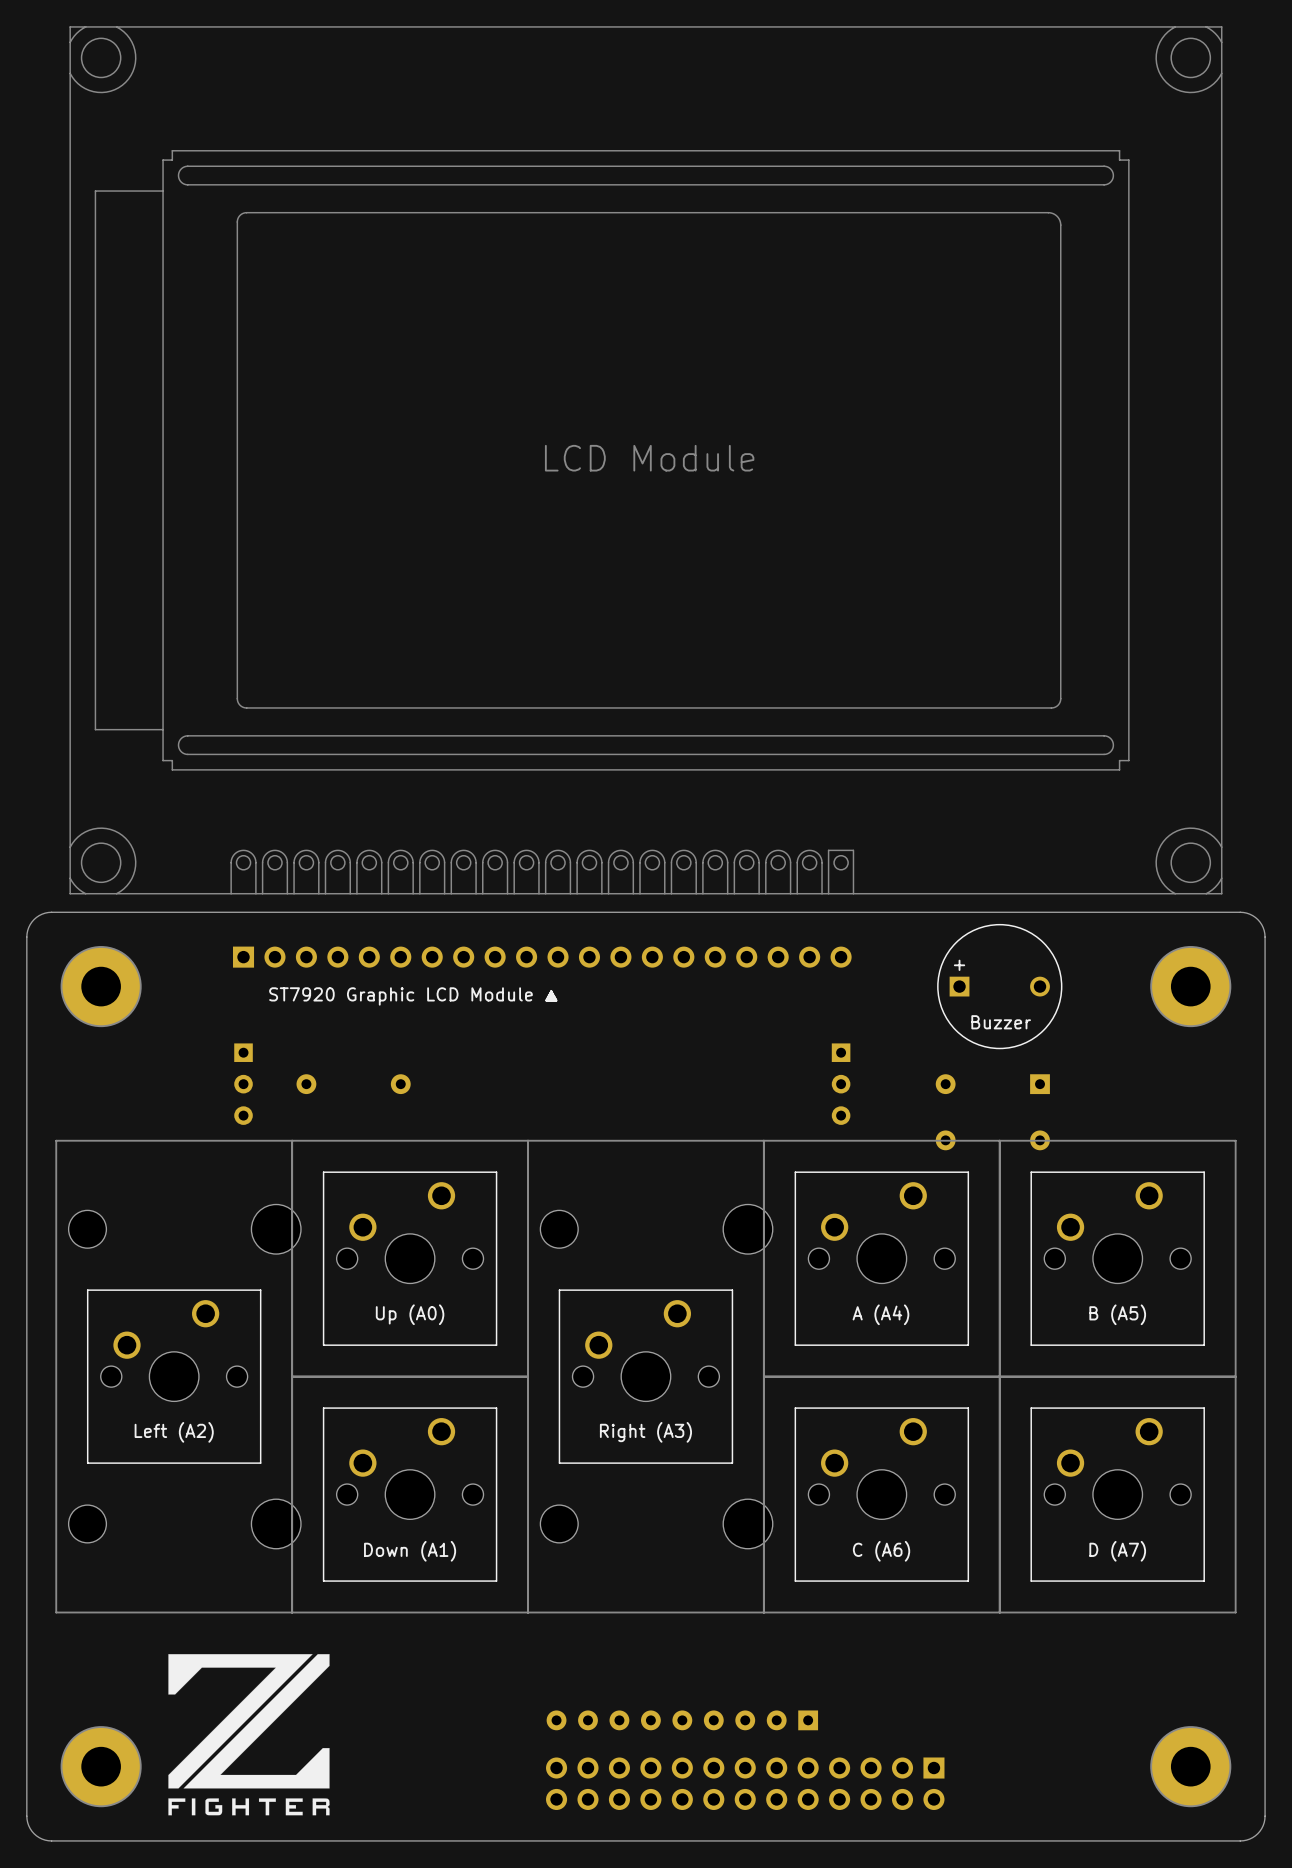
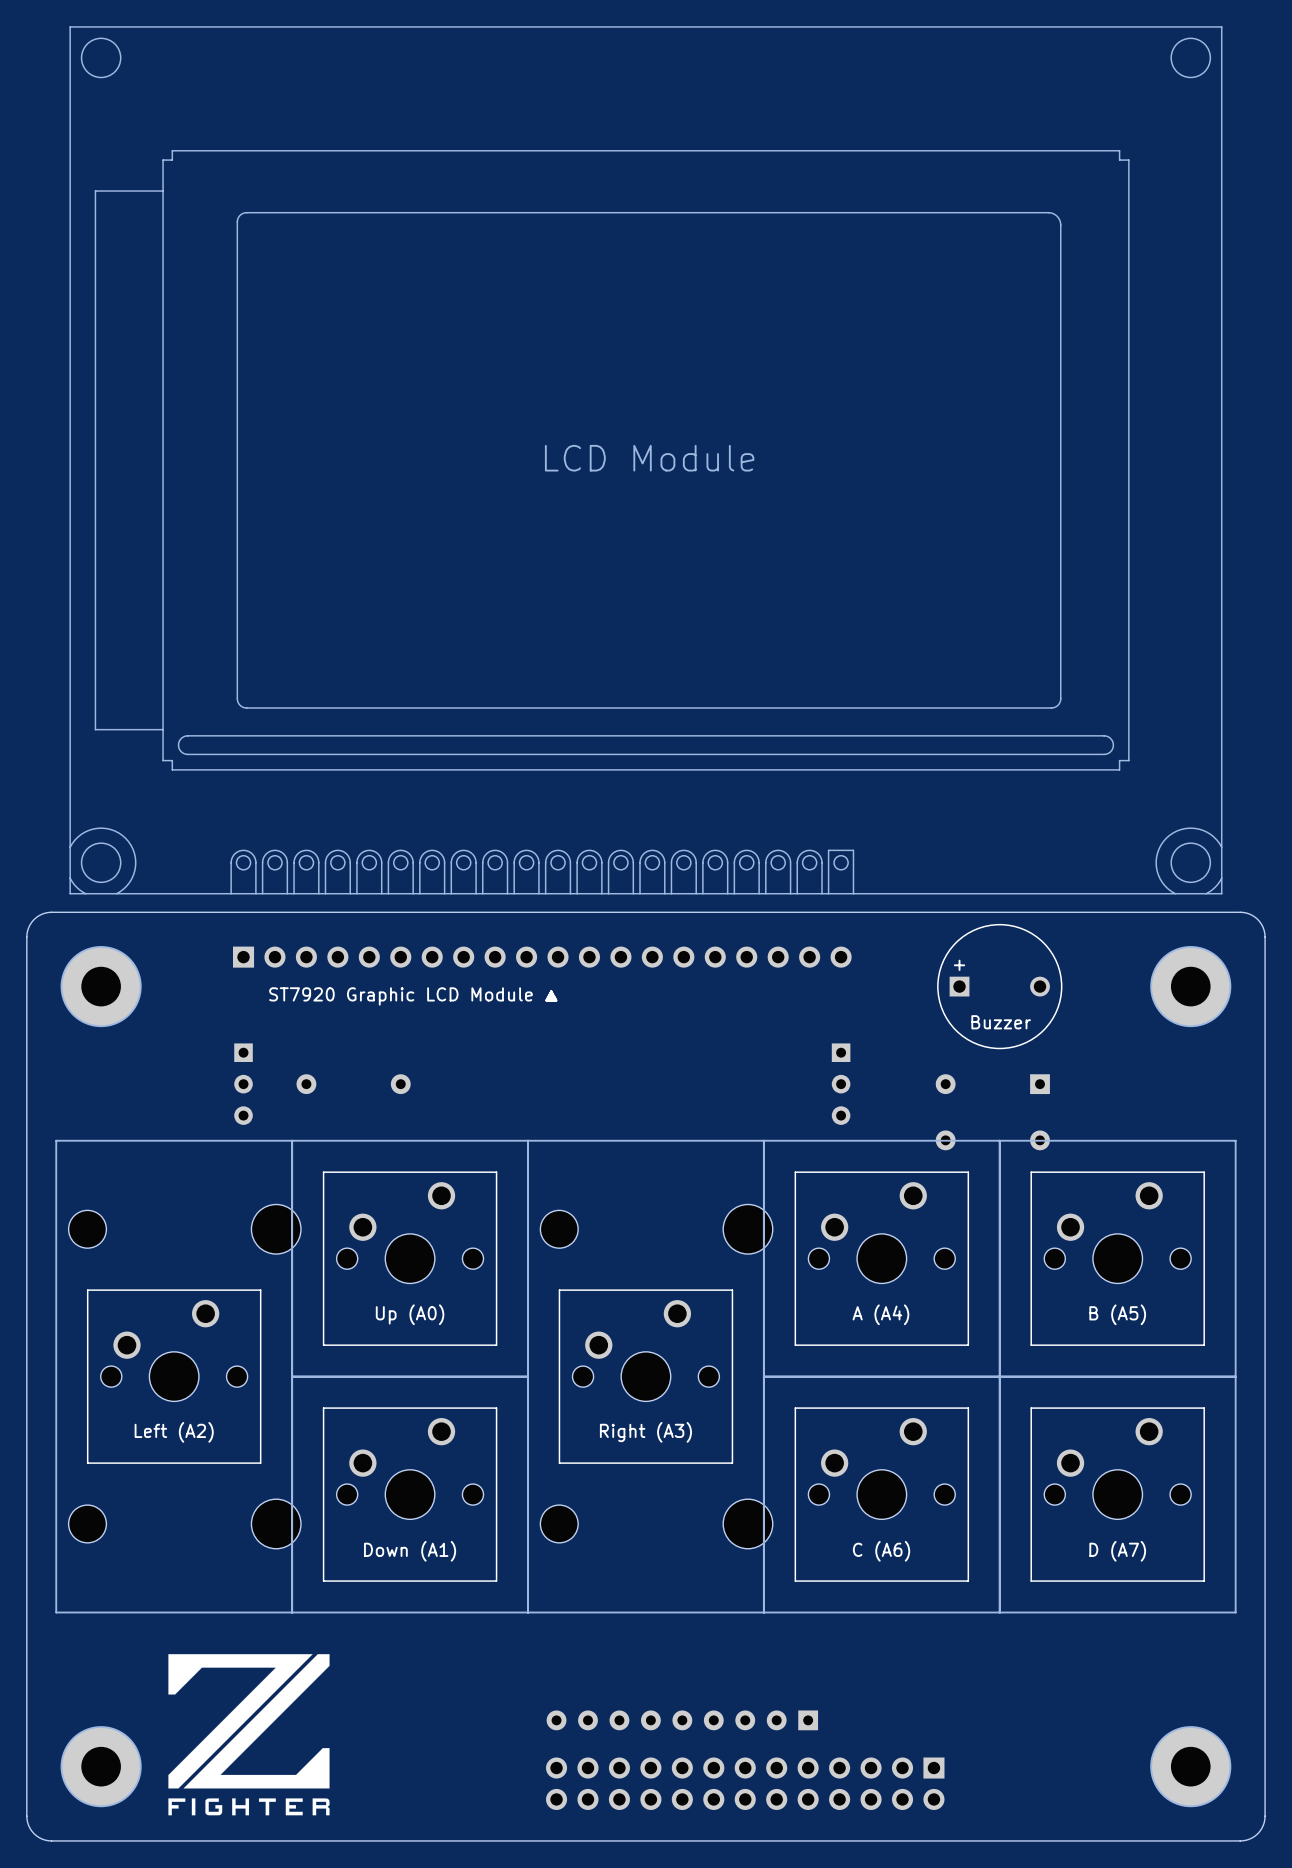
line: (85, 26) (76, 33) (70, 42) -> none
line: (116, 26) (126, 34) (134, 50) (134, 67) (125, 82) (110, 91) (93, 91) (78, 83) (70, 73) -> none
line: (1175, 26) (1164, 34) (1157, 50) (1157, 67) (1166, 82) (1181, 91) (1198, 91) (1213, 83) (1221, 73) -> none
line: (1206, 26) (1215, 33) (1221, 42) -> none
line: (187, 166) (1104, 166) (1110, 168) (1113, 175) (1110, 182) (1104, 184) (187, 184) (181, 182) (178, 175) (181, 168) (187, 166) -> none

